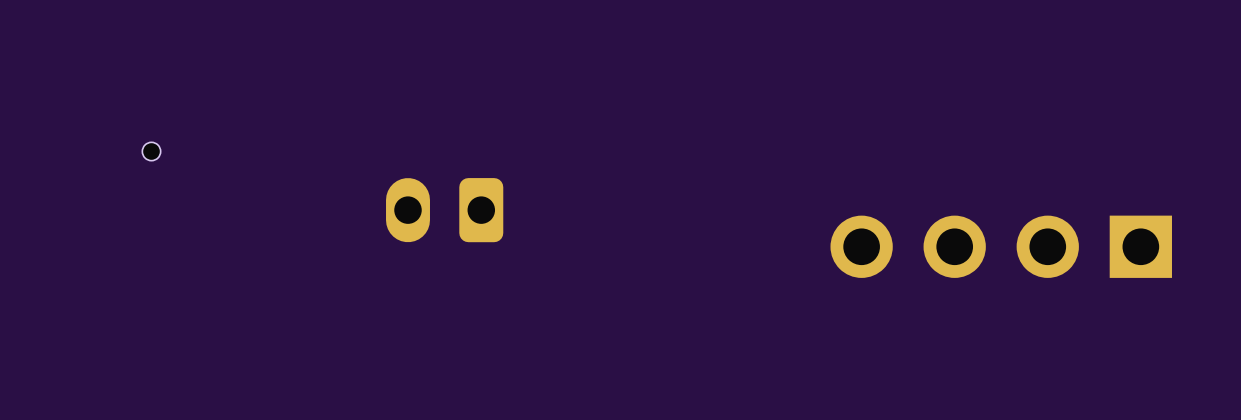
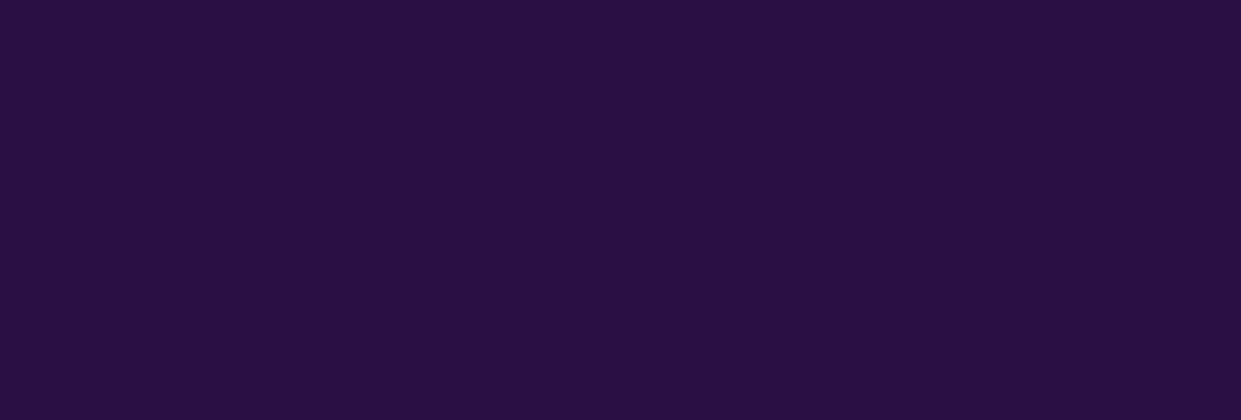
part: (151, 151) -> none
part: (444, 210) -> none
part: (1001, 246) -> none

